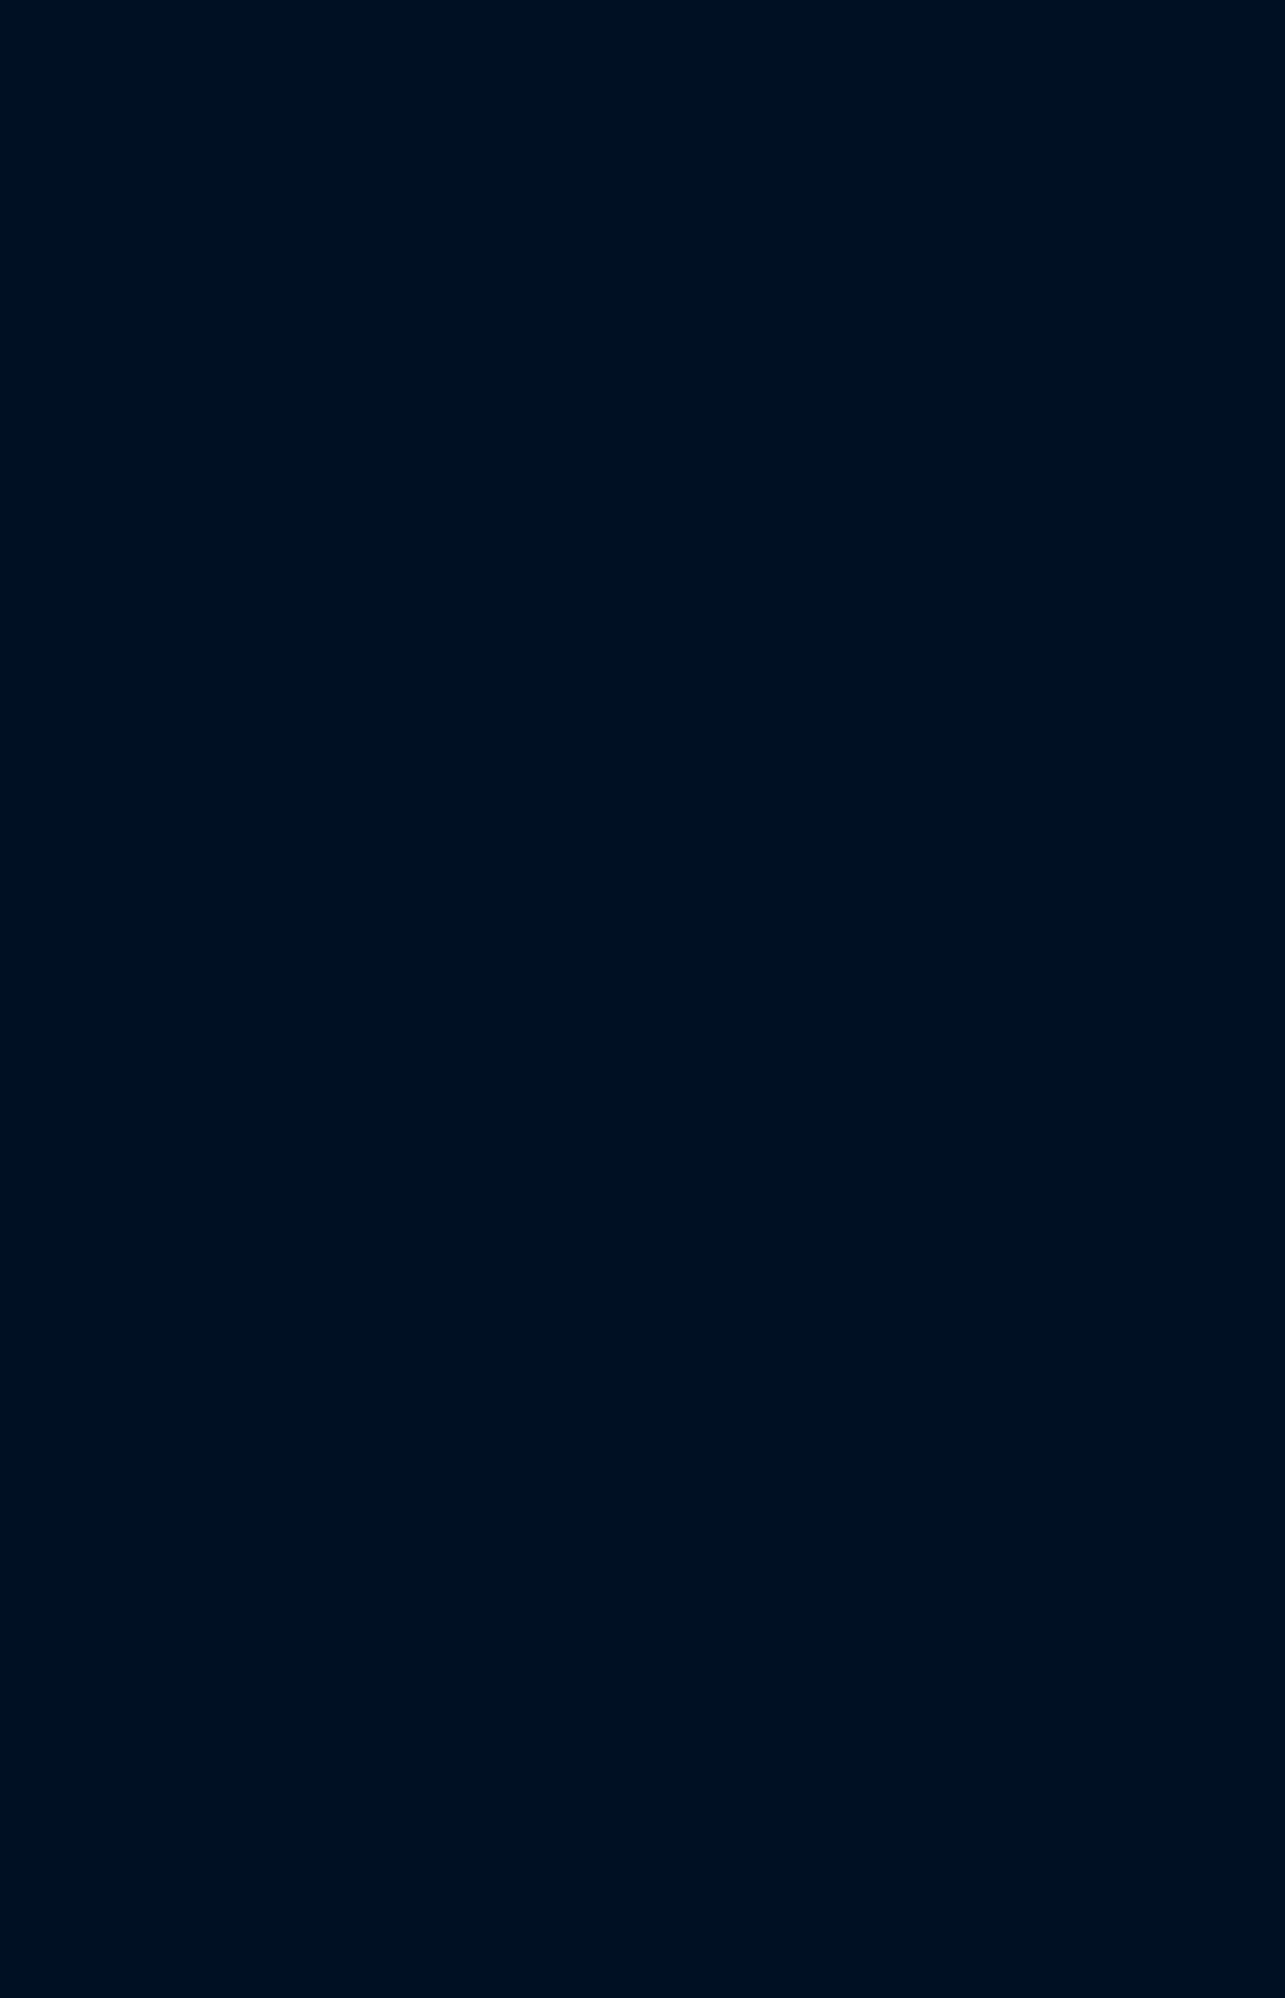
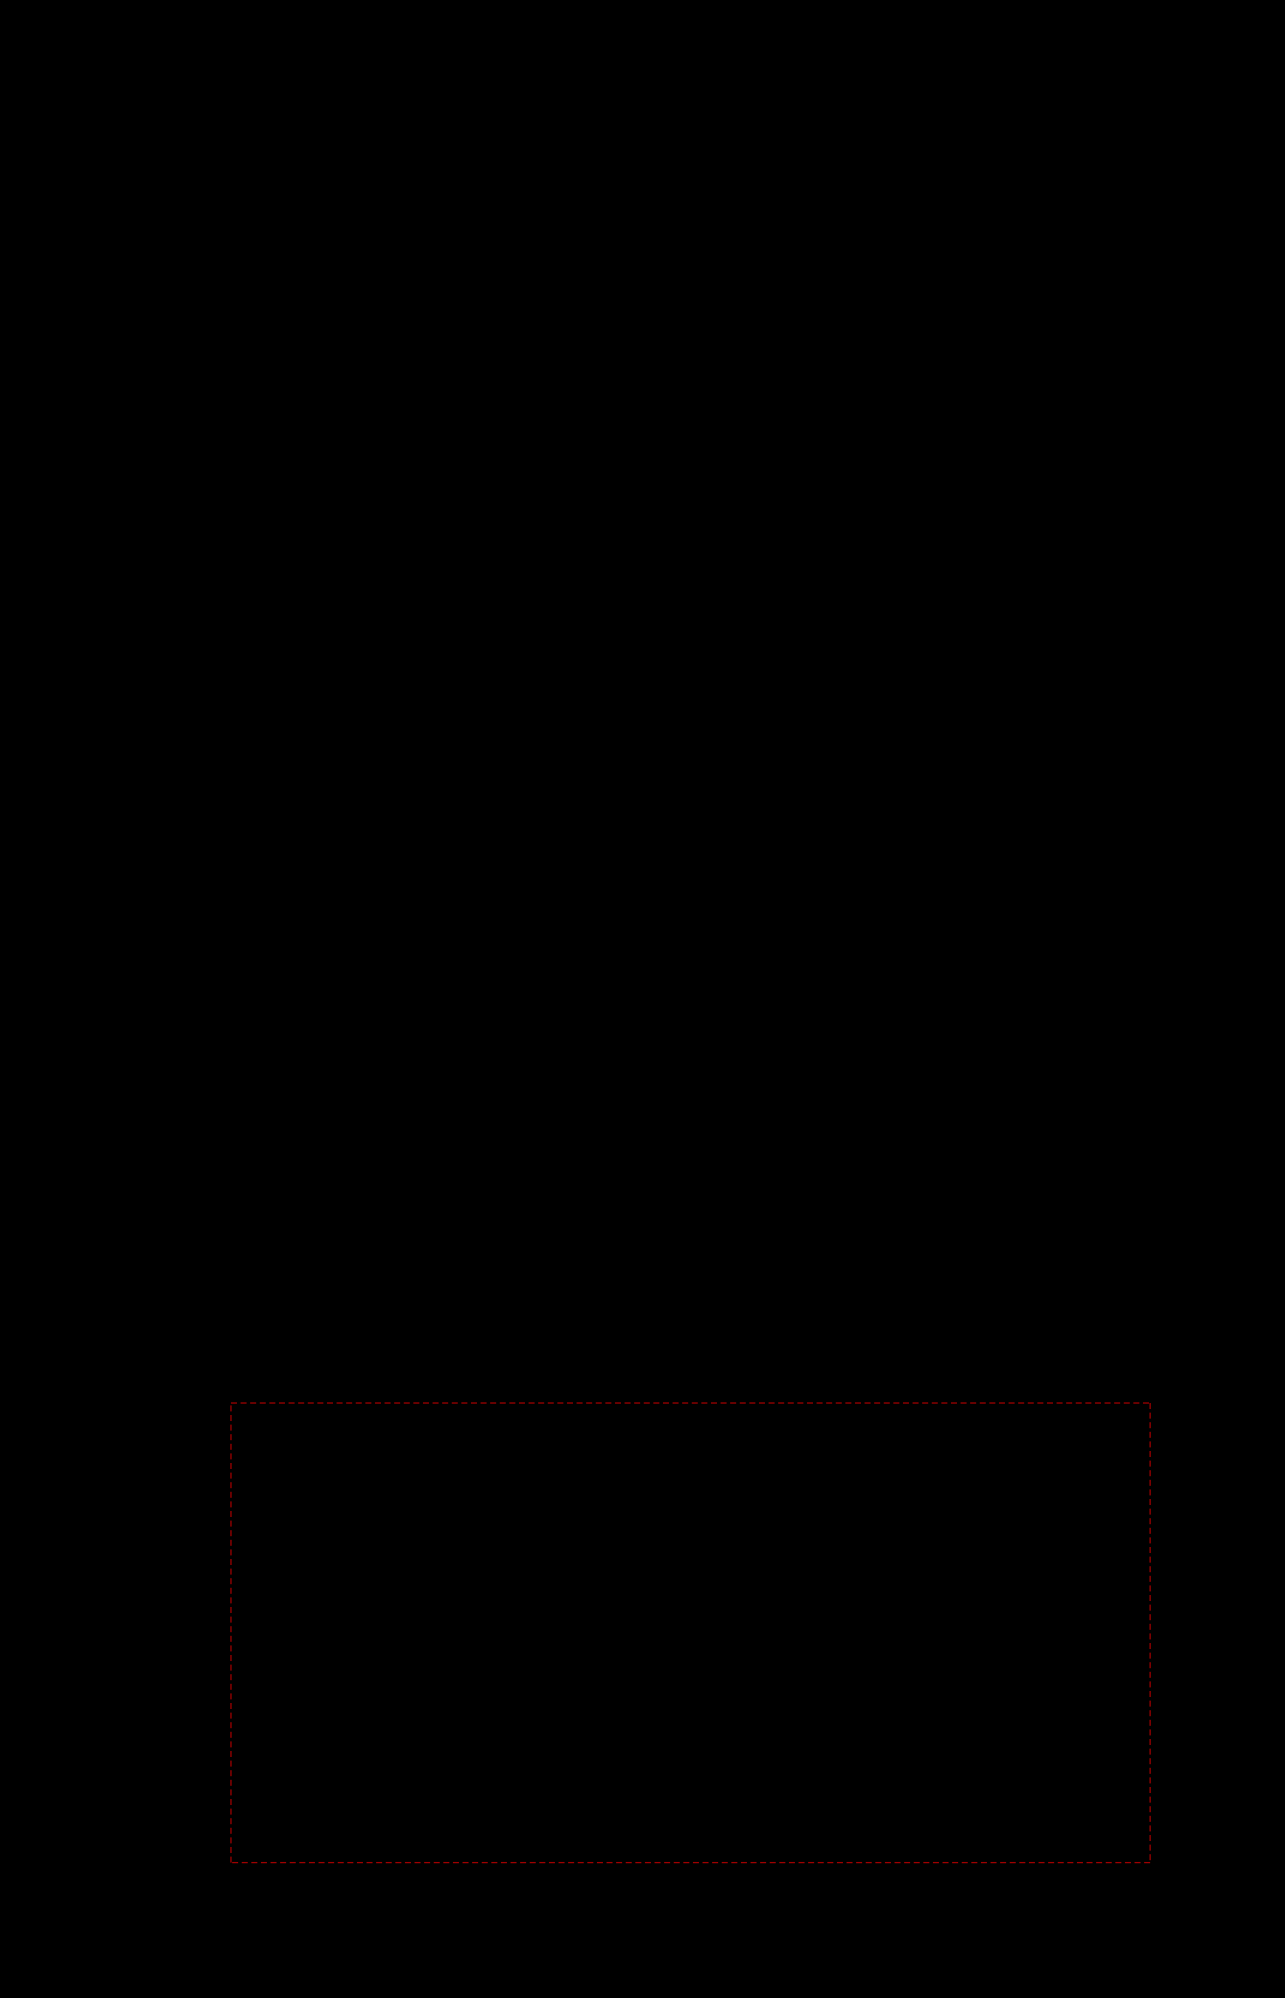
zone outline: none -> (230, 1403) (1150, 1403) (1150, 1862) (230, 1862) (230, 1403)

